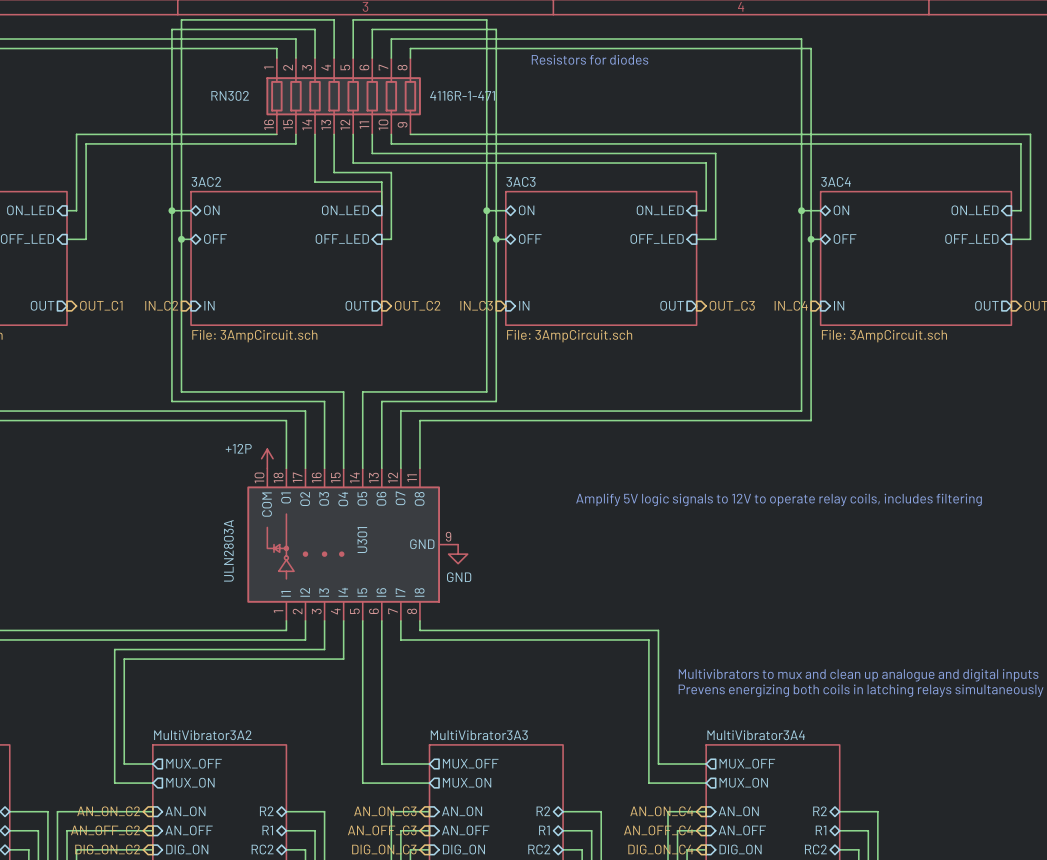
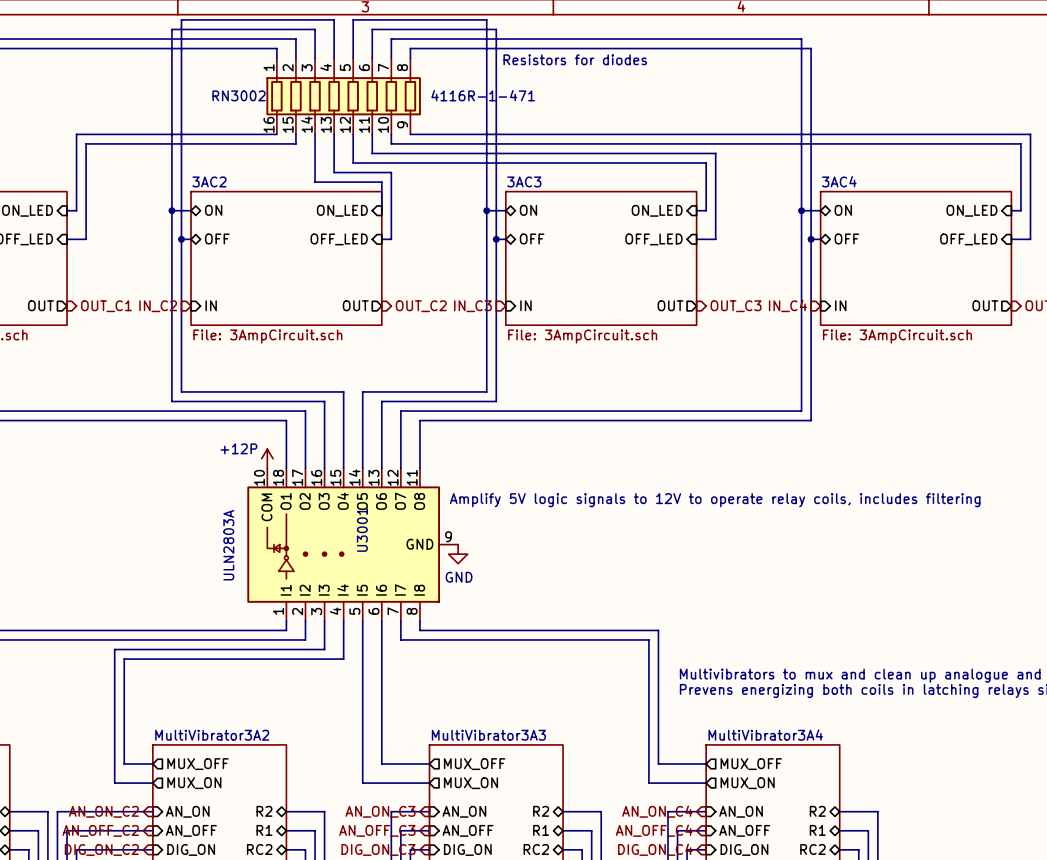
RN302 name: RN302 (230, 95) -> RN3002 (239, 95)
U301 name: U301 (362, 540) -> U3001 (362, 529)

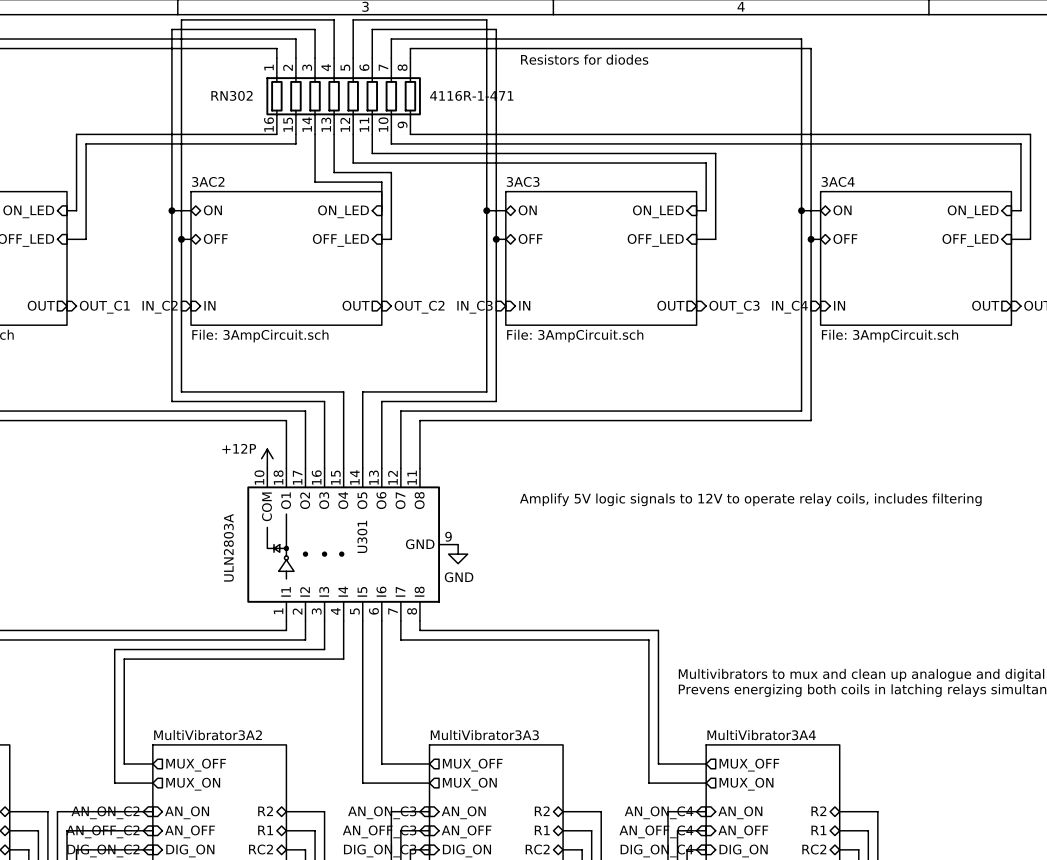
RN3002 name: RN3002 (239, 95) -> RN302 (232, 95)
U3001 name: U3001 (362, 529) -> U301 (362, 536)

